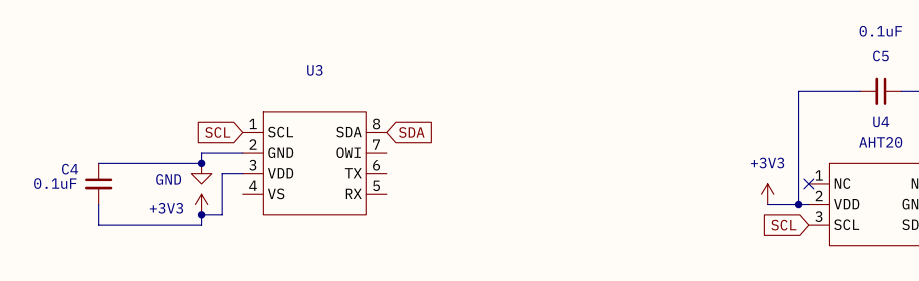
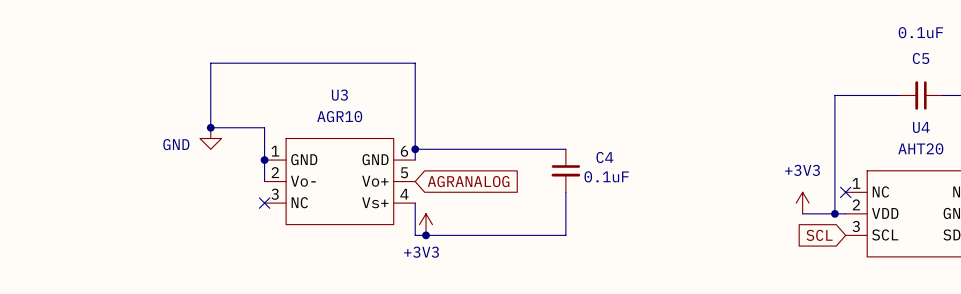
U3 symbol: [242, 111, 387, 215] -> [264, 138, 416, 225]
U3 value: none -> AGR10 (339, 116)
junction: none -> (210, 127)
global label: SCL (217, 132) -> none
global label: SDA (411, 132) -> none
wire: none -> (415, 149) (565, 149)
junction: none -> (415, 149)
wire: (242, 153) (201, 153) (201, 163) (98, 163) -> none
junction: none -> (264, 160)
wire: none -> (415, 160) (415, 63) (210, 63) (210, 127) (264, 127) (264, 181)
junction: (201, 163) -> none
C4 name position: C4 (70, 169) -> C4 (604, 157)
power symbol position: GND (201, 173) -> GND (210, 138)
wire: (242, 173) (222, 173) (222, 214) (201, 214) (201, 225) (98, 225) (98, 204) -> none
global label: none -> AGRANALOG (468, 181)
C4 value position: 0.1uF (55, 183) -> 0.1uF (606, 176)
C4 position: (98, 183) -> (565, 170)
wire: none -> (565, 192) (565, 235) (415, 235) (415, 203)
no-connect mark: none -> (264, 203)
power symbol: +3V3 (201, 204) -> none
junction: (201, 214) -> none
power symbol: none -> +3V3 (425, 224)
junction: none -> (425, 235)

